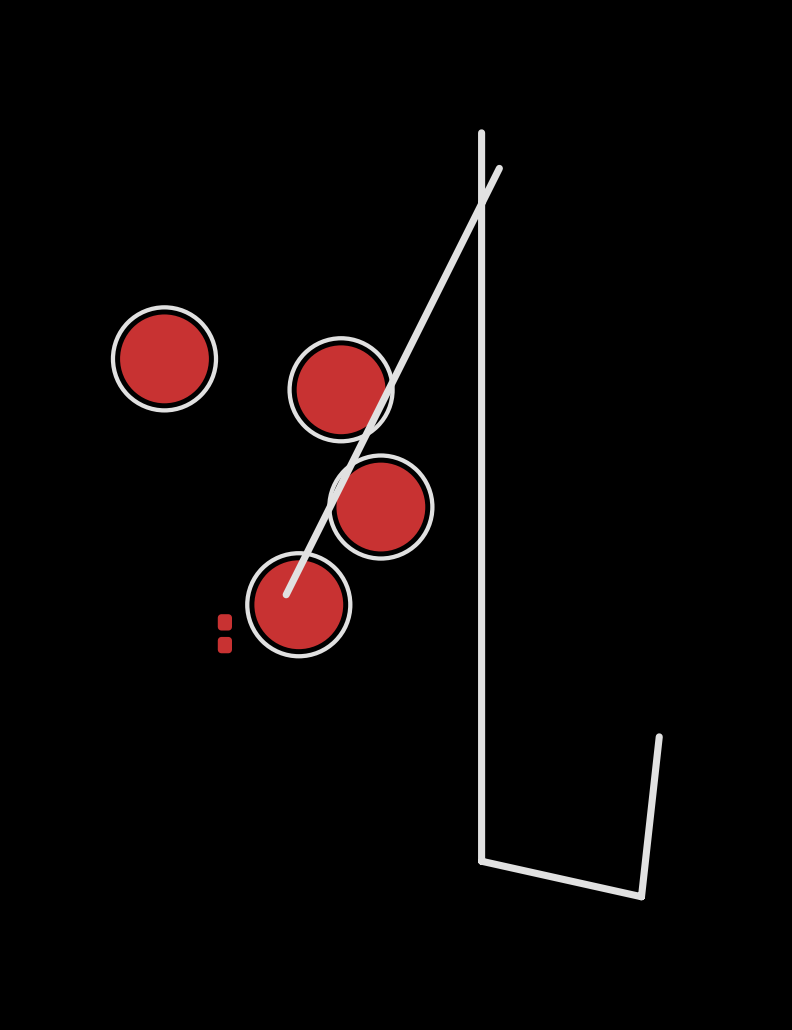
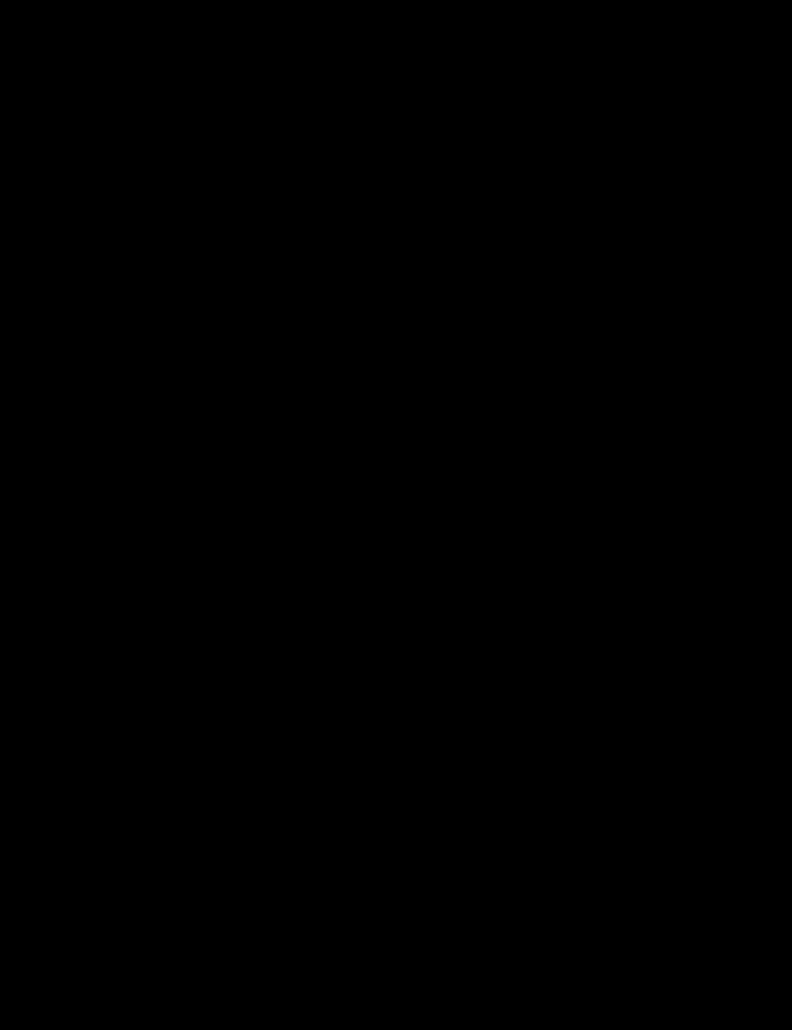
line: (481, 132) (481, 861) (641, 896) (659, 736) -> none
line: (499, 168) (286, 594) -> none
part: (164, 358) -> none
part: (341, 389) -> none
part: (380, 507) -> none
part: (298, 604) -> none
part: (224, 633) -> none

